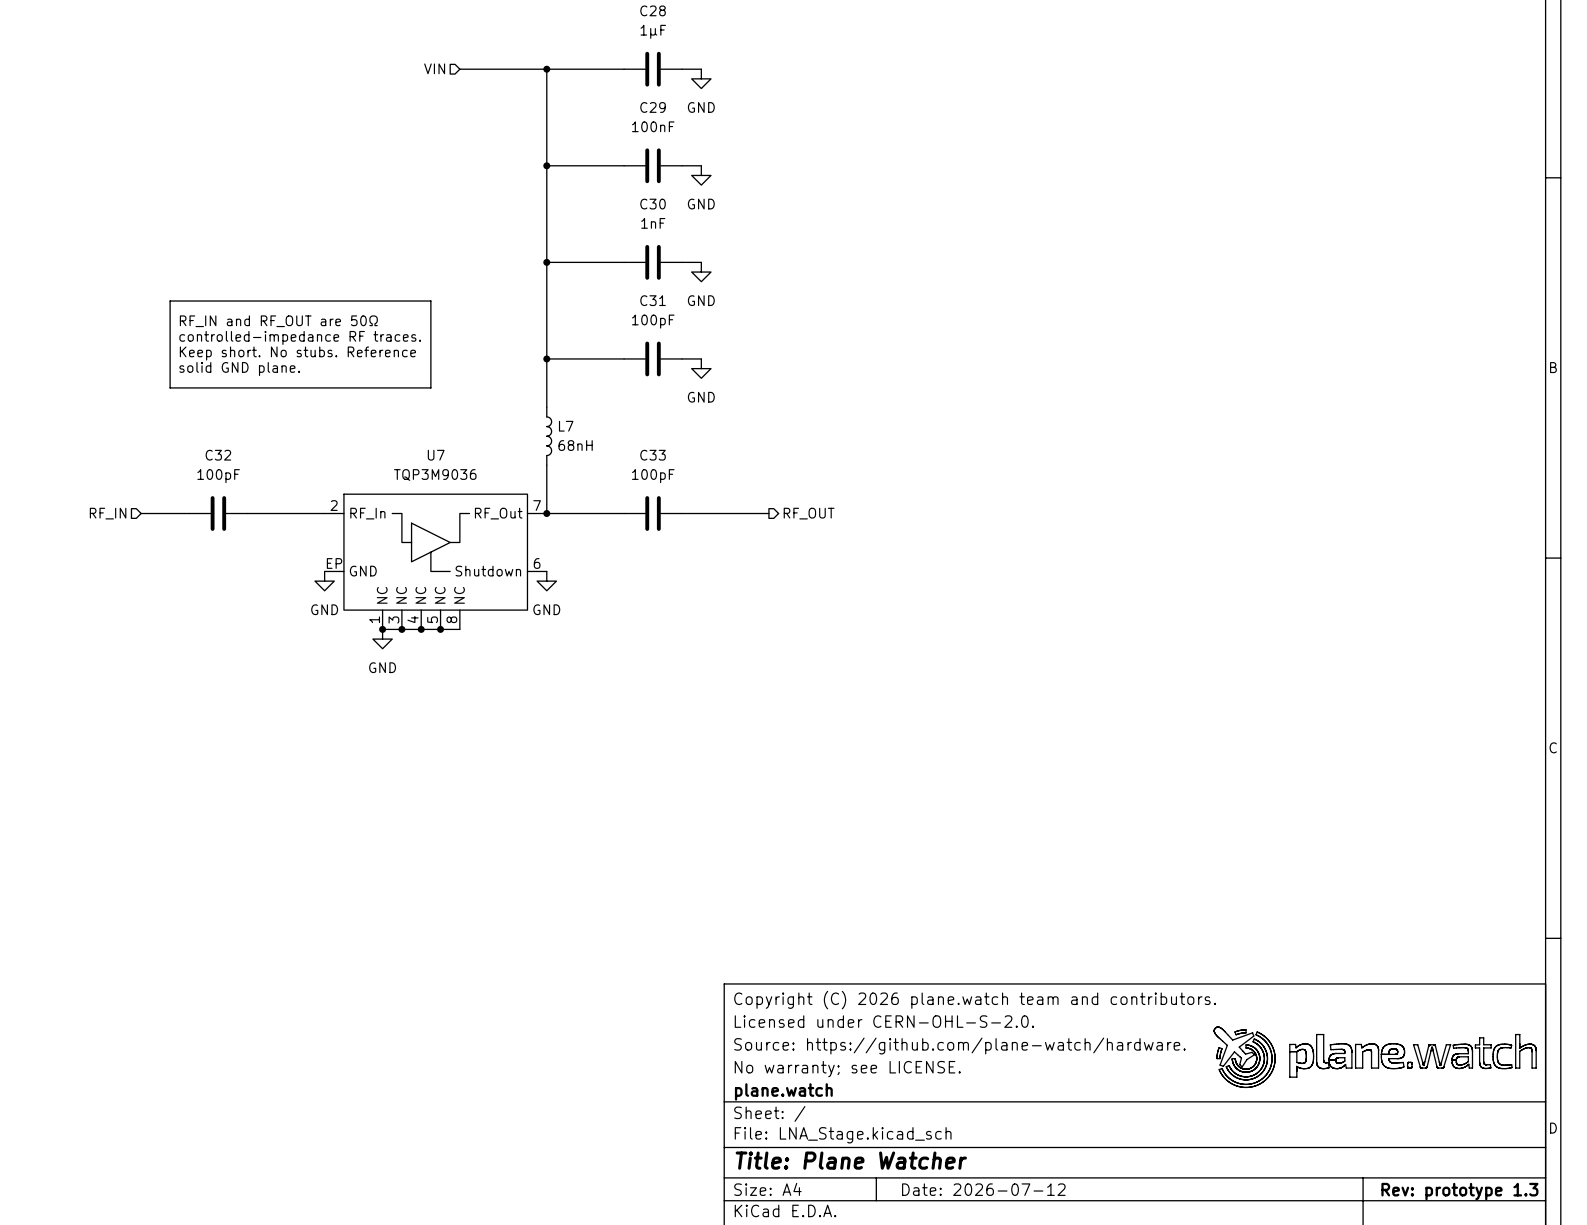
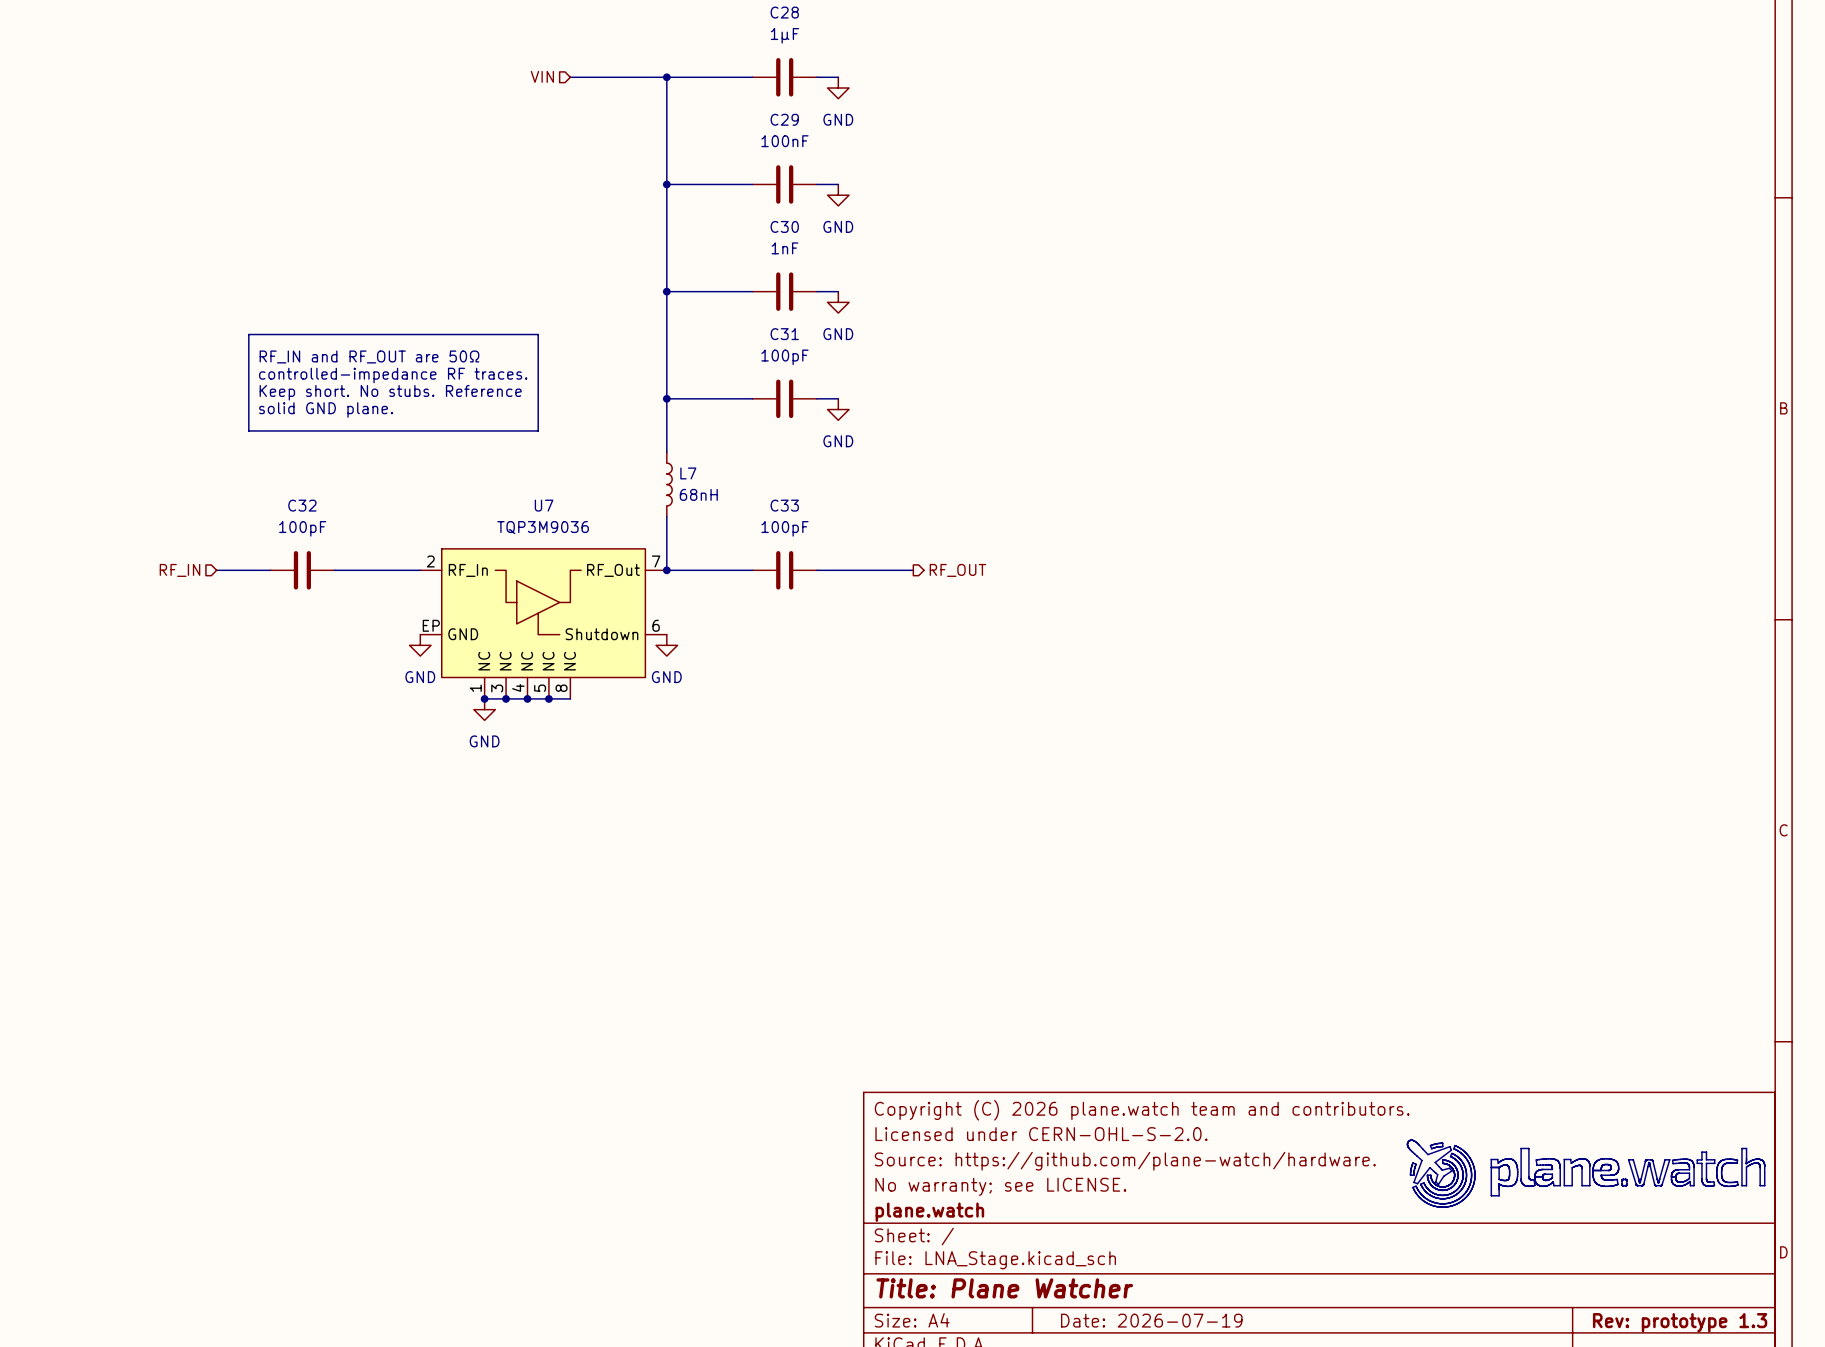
title block: Date: 2026-07-12 (983, 1189) -> Date: 2026-07-19 (1151, 1320)

